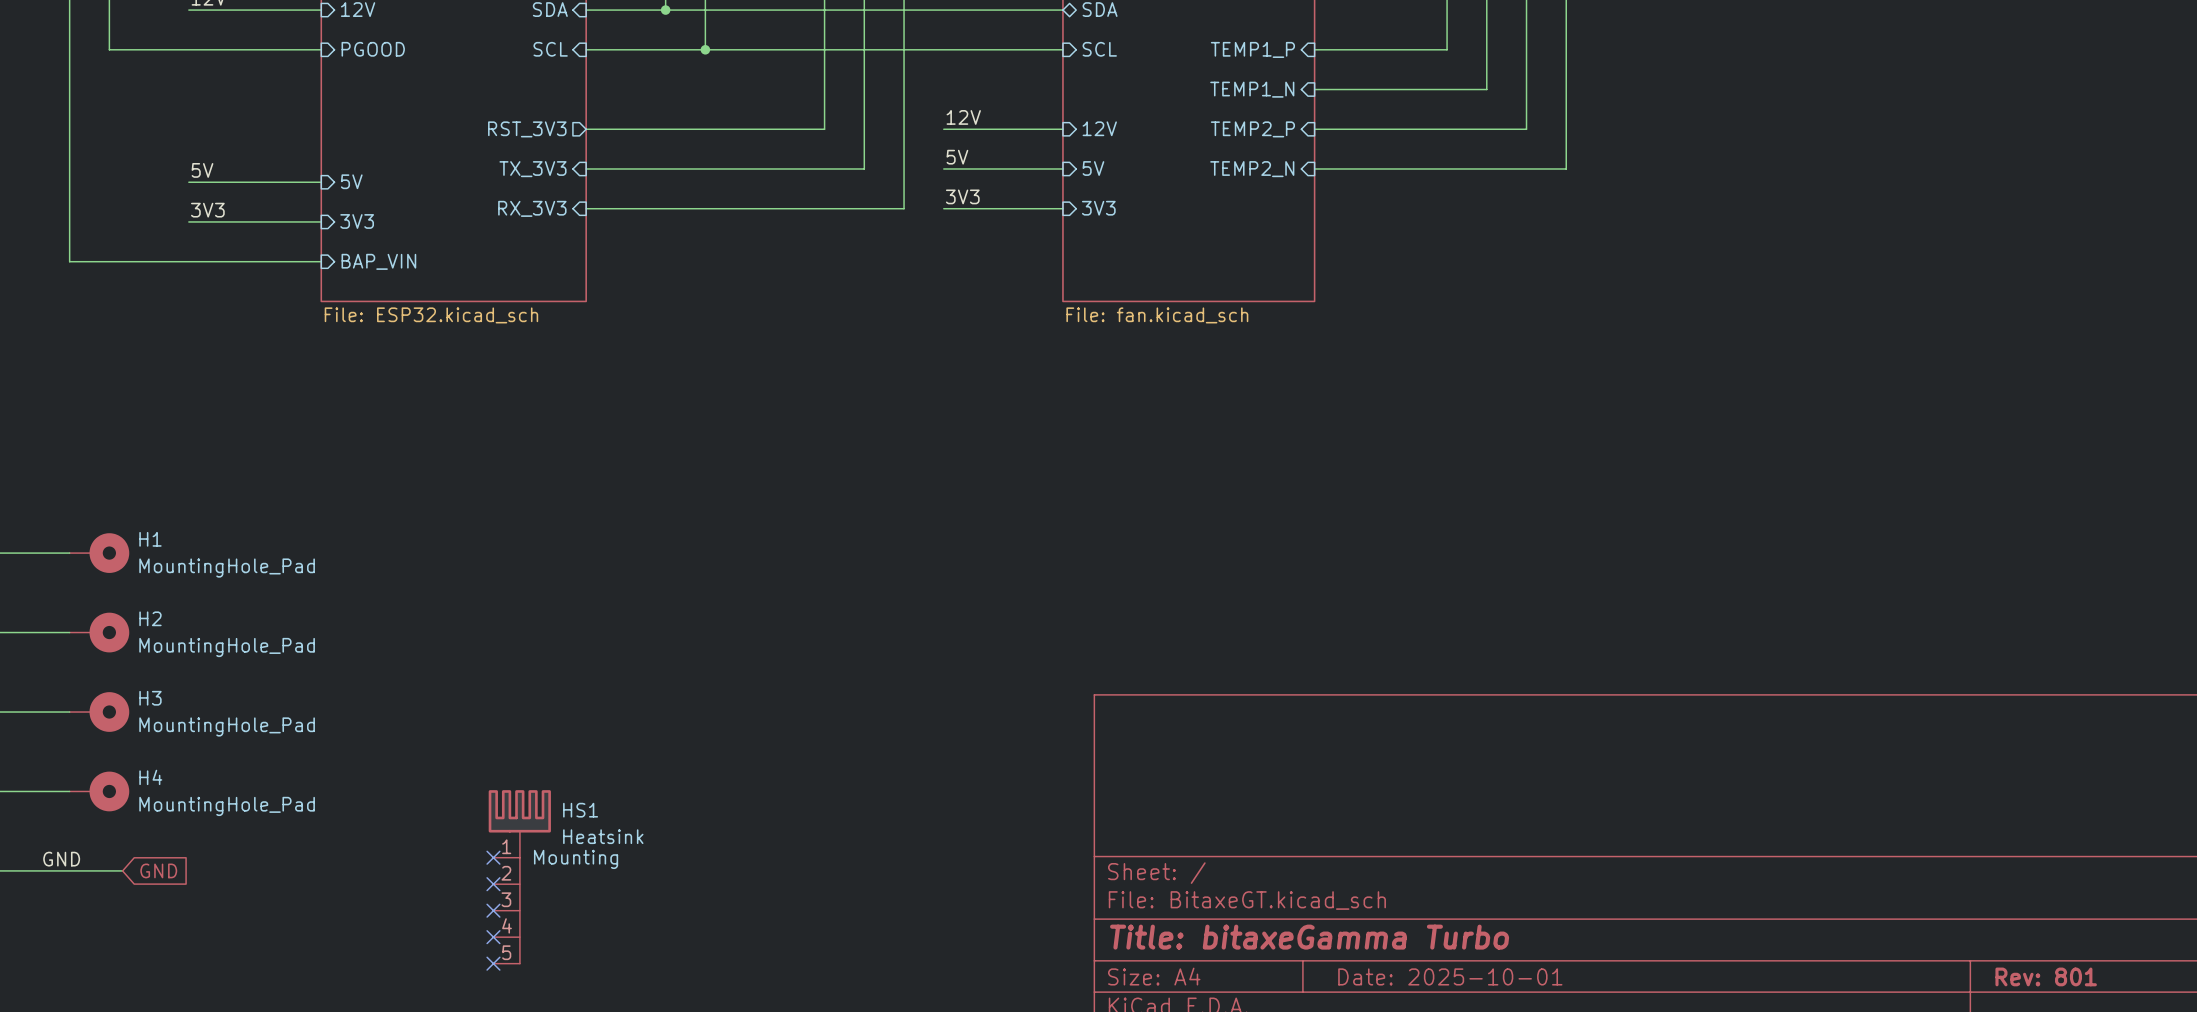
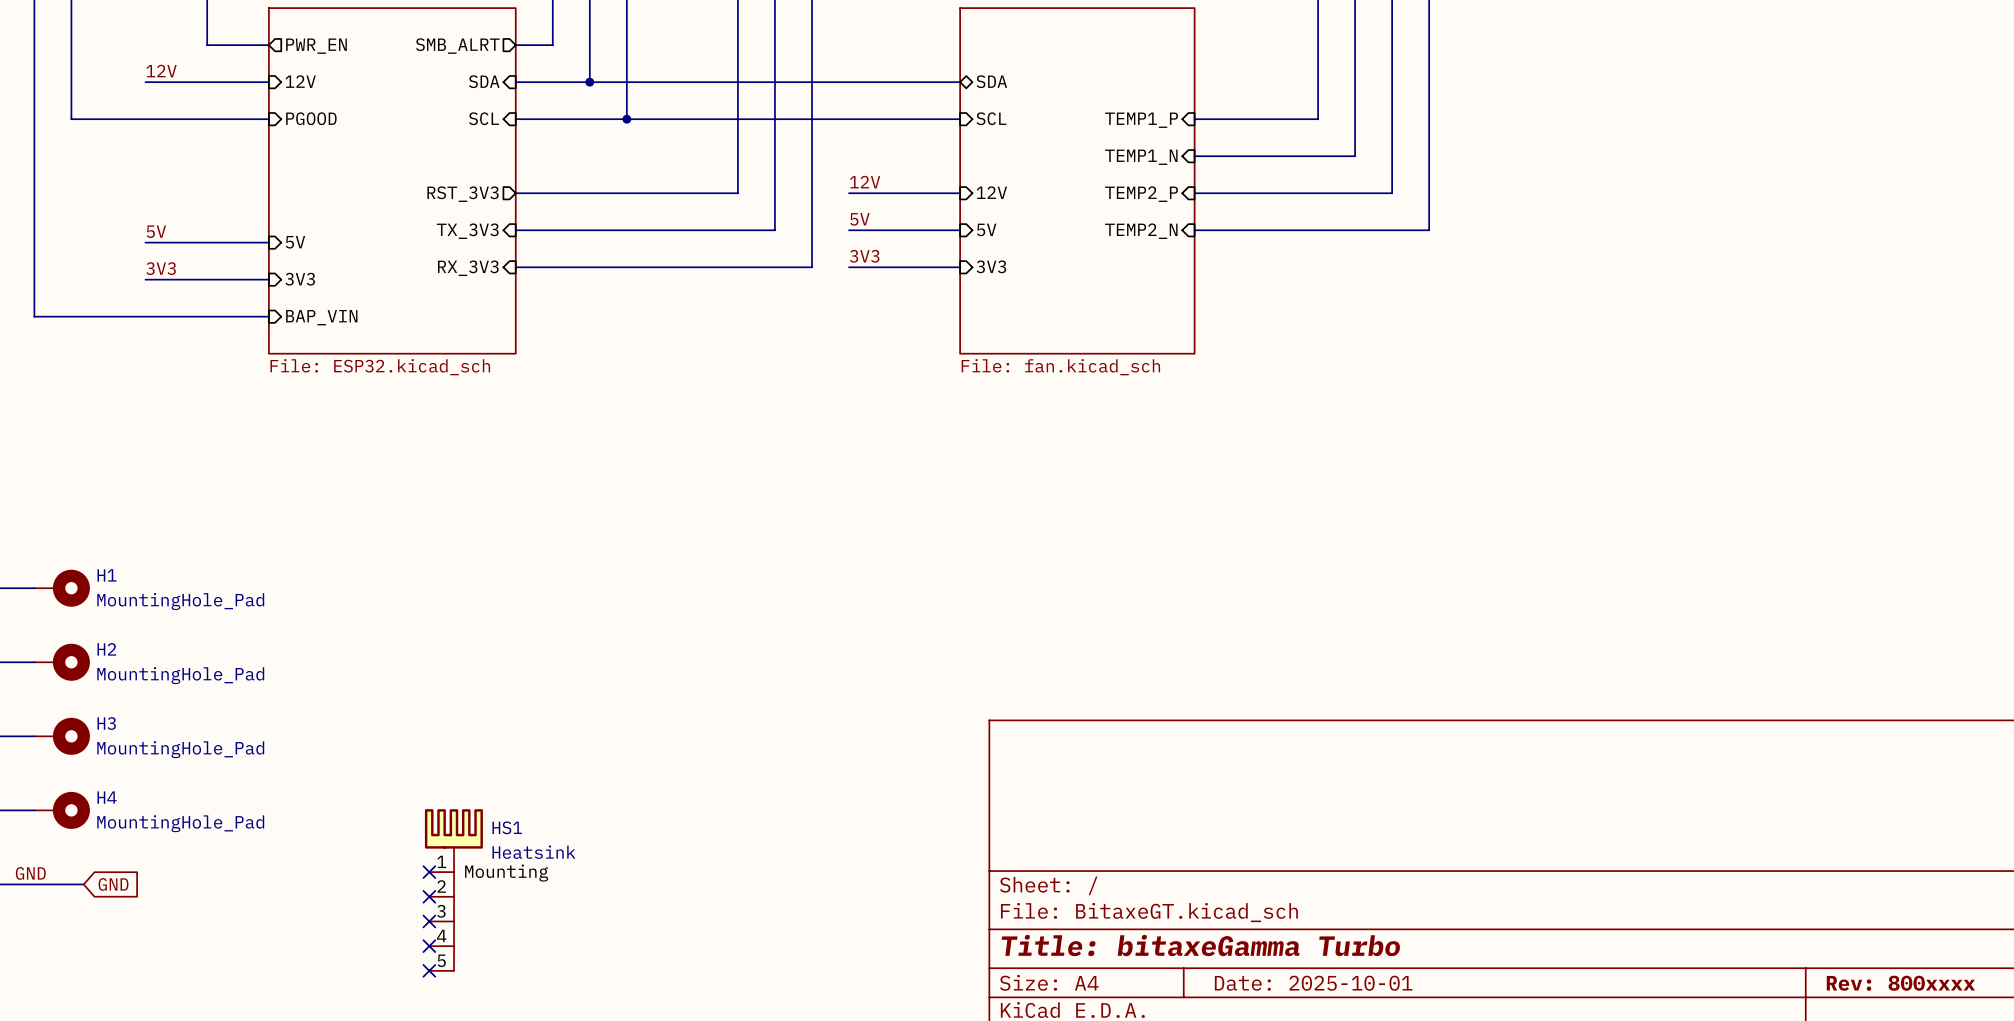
title block: Rev: 801 (2046, 976) -> Rev: 800xxxx (1900, 983)

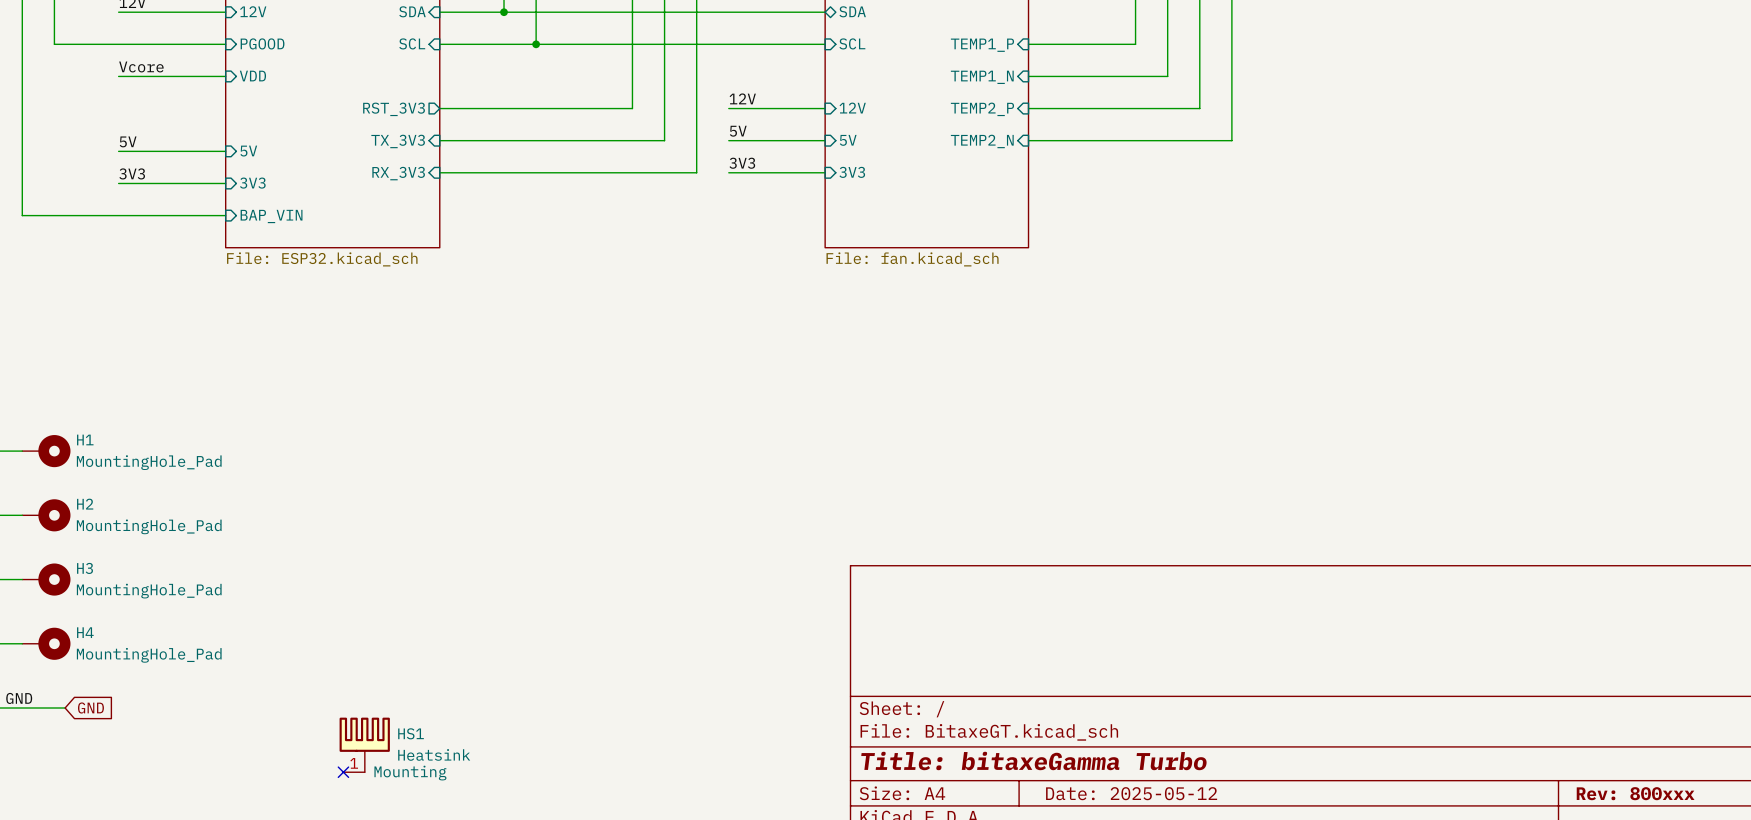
label: none -> Vcore (141, 66)
sheet pin: none -> VDD (252, 76)
wire: none -> (118, 76) (225, 76)
HS1 symbol: [424, 809, 483, 971] -> [339, 717, 390, 773]
HS1 name position: HS1 (507, 827) -> HS1 (411, 733)
HS1 value position: Heatsink (533, 852) -> Heatsink (434, 754)
no-connect mark: (429, 872) -> none
no-connect mark: (429, 896) -> none
no-connect mark: (429, 921) -> none
no-connect mark: (429, 946) -> none
no-connect mark: none -> (343, 772)
no-connect mark: (429, 970) -> none
title block: Date: 2025-10-01 (1313, 983) -> Date: 2025-05-12 (1131, 793)
title block: Rev: 800xxxx (1900, 983) -> Rev: 800xxx (1635, 793)

